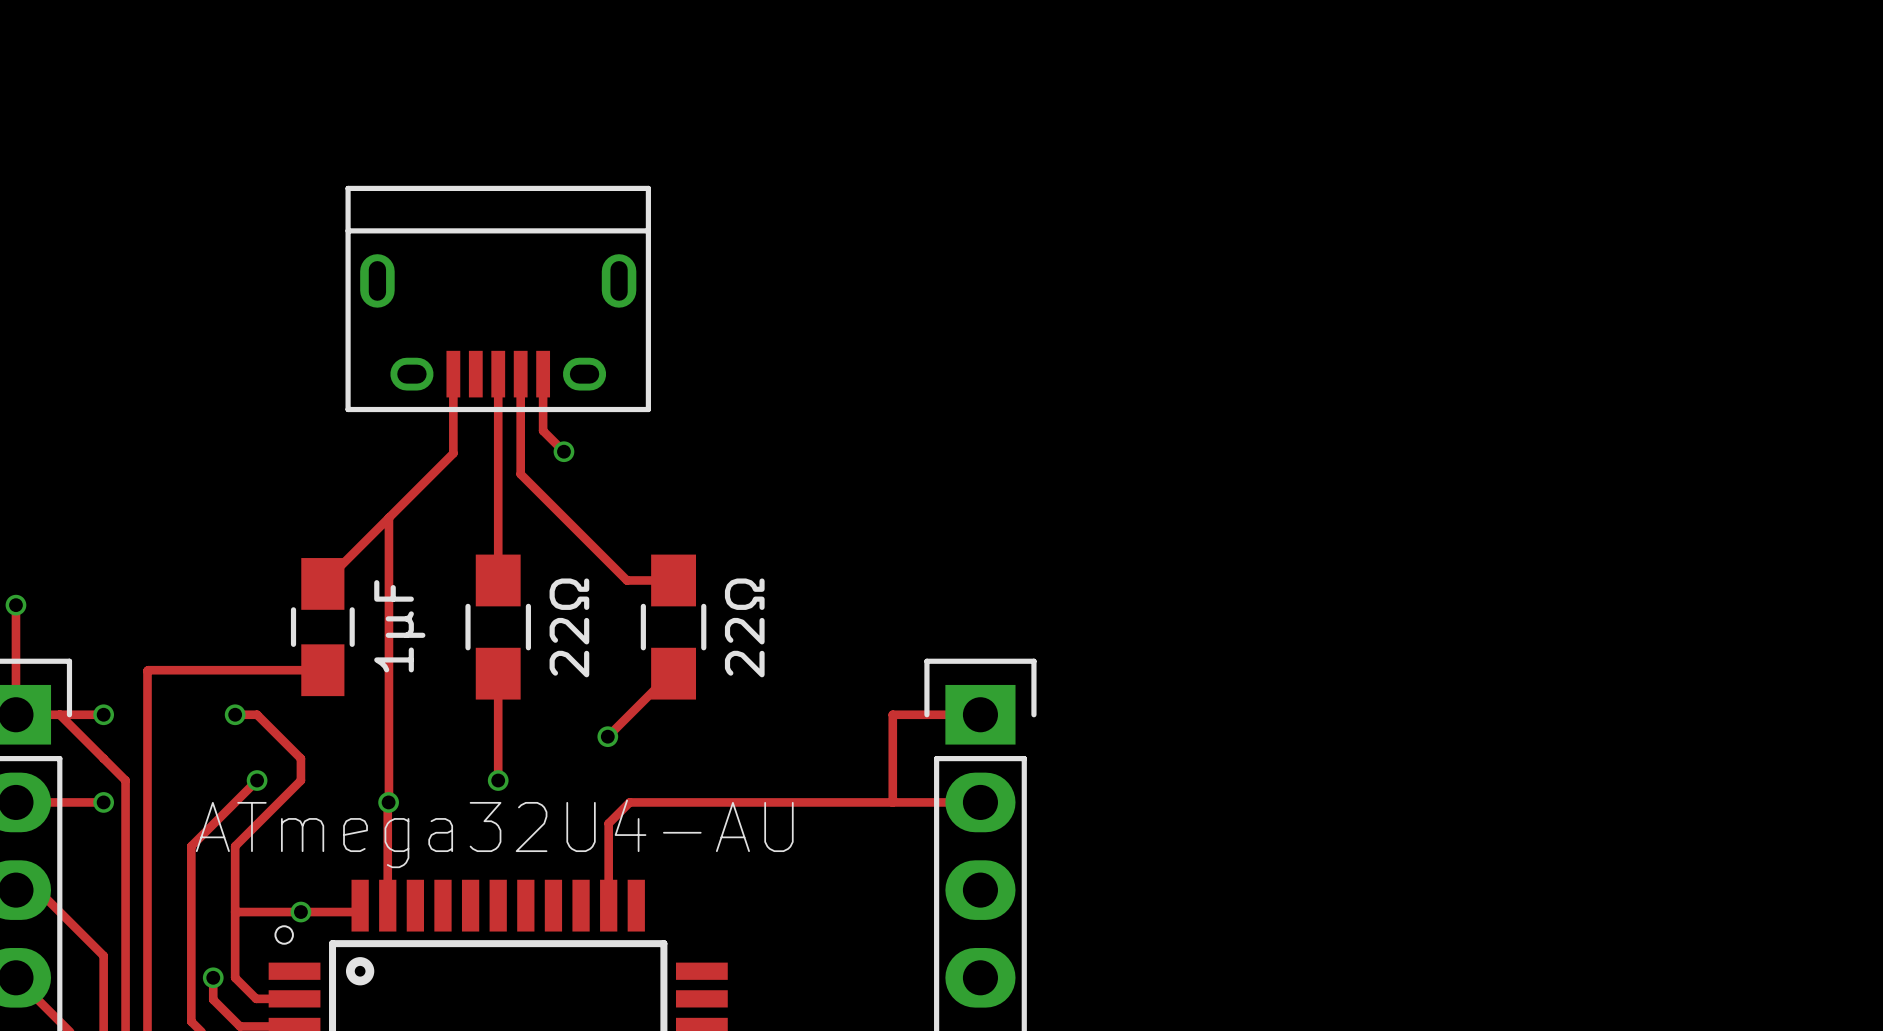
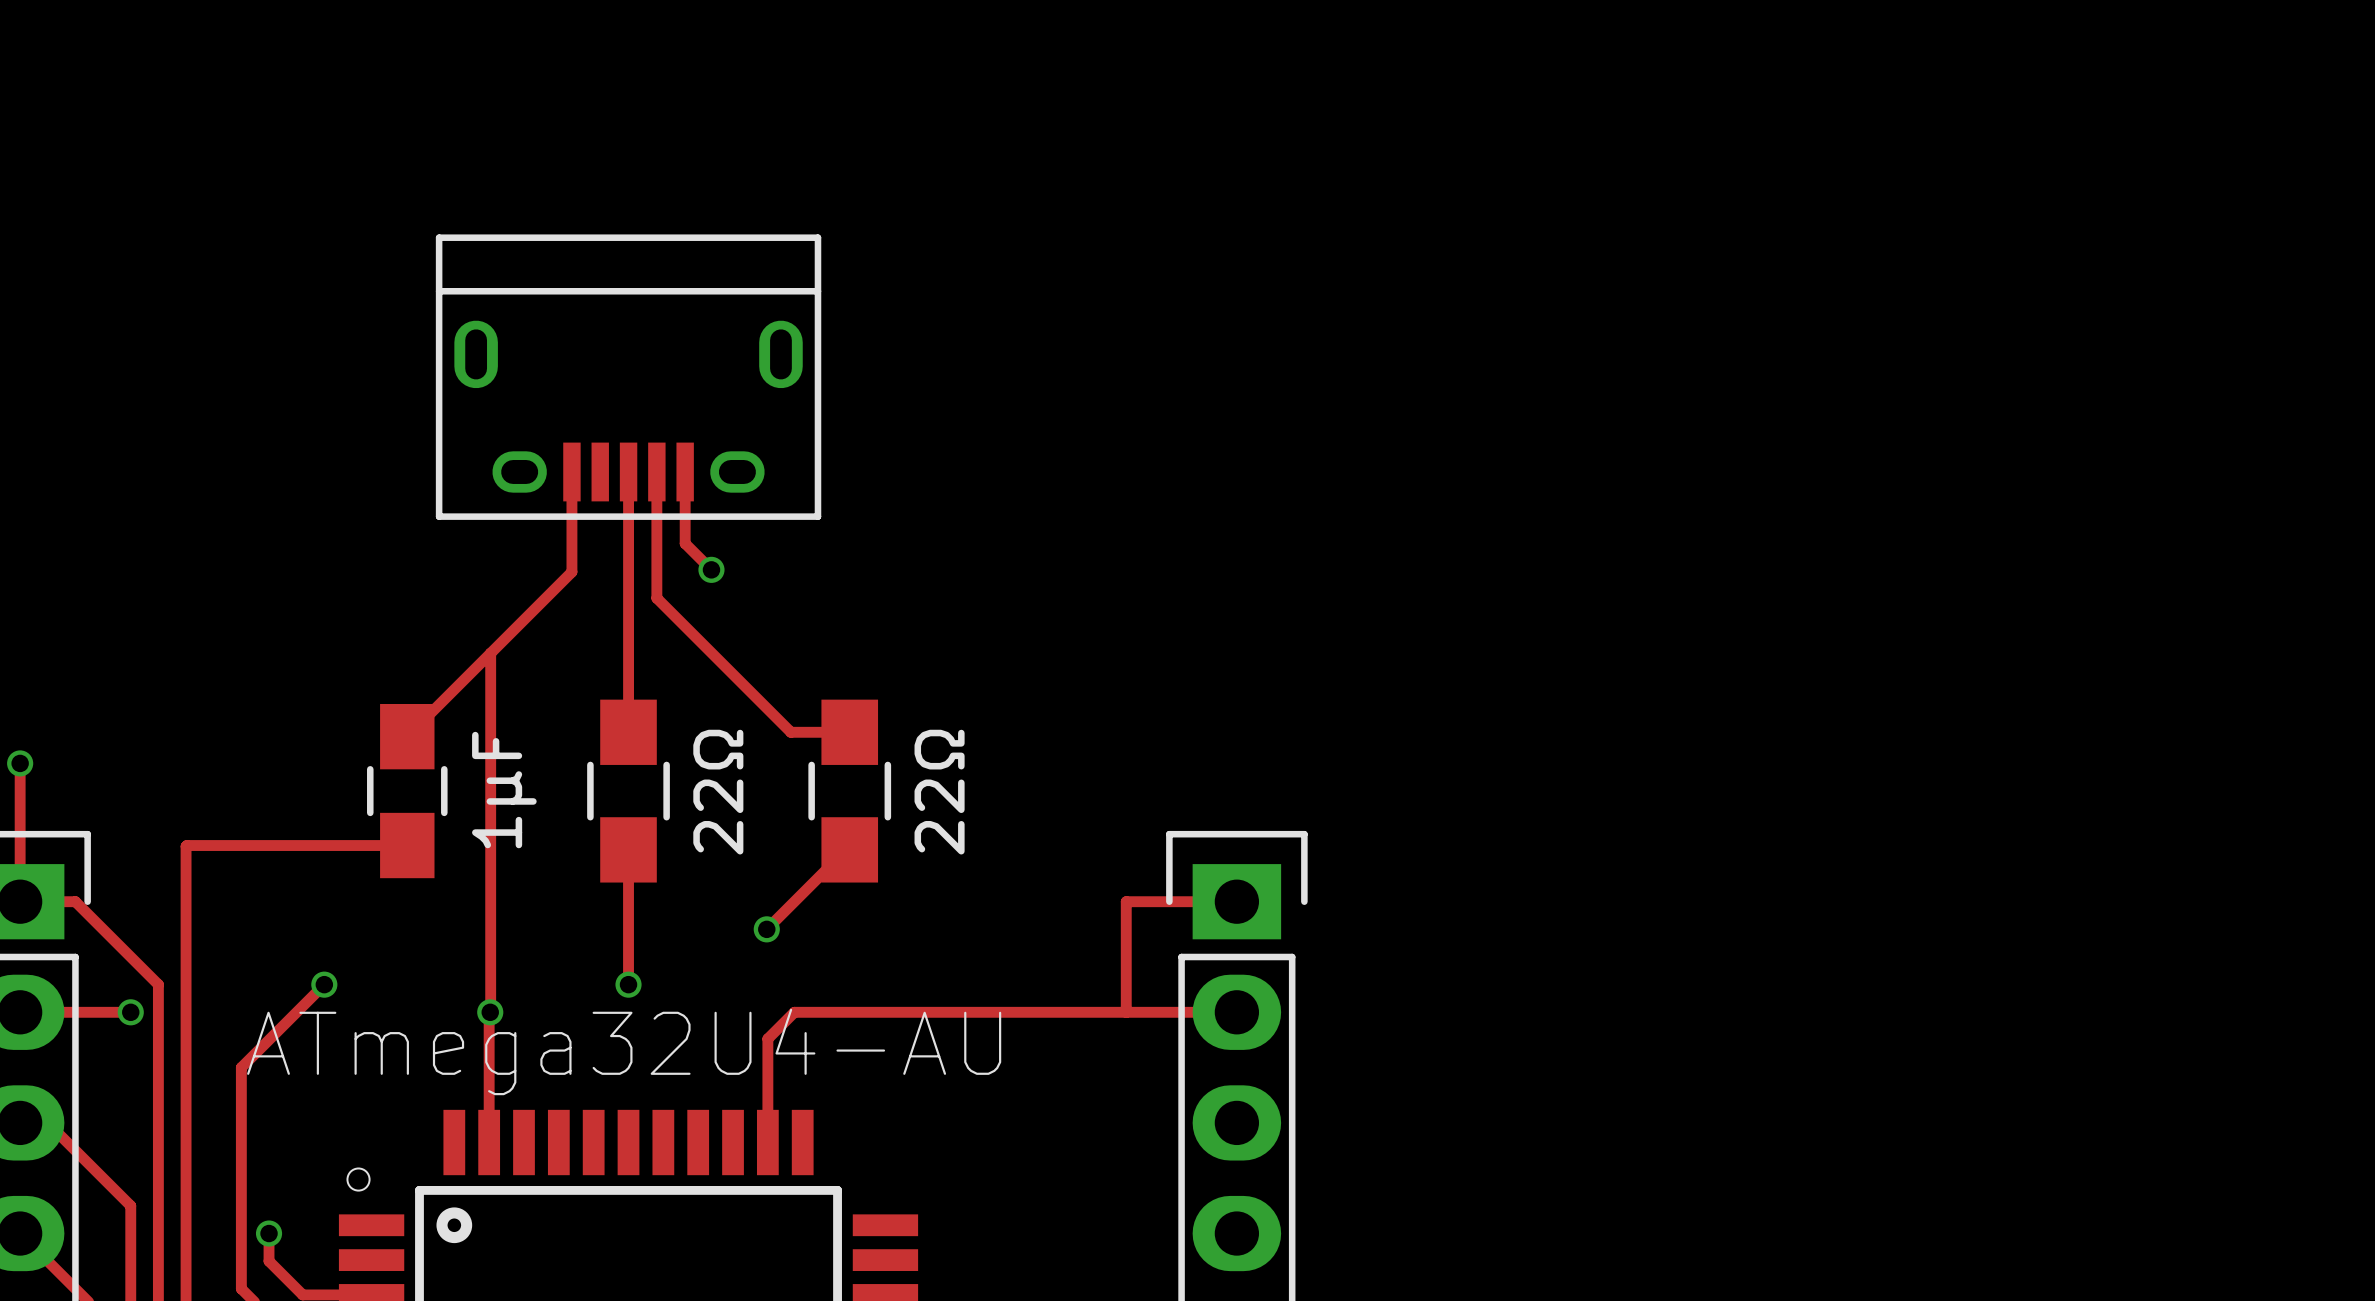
track: (59, 714) (103, 714) -> none
via: (103, 714) -> none
track: (235, 714) (257, 714) (300, 758) (300, 780) (235, 846) (235, 977) (256, 998) (294, 998) -> none
via: (235, 714) -> none
track: (360, 905) (353, 912) (235, 912) -> none
via: (300, 912) -> none

